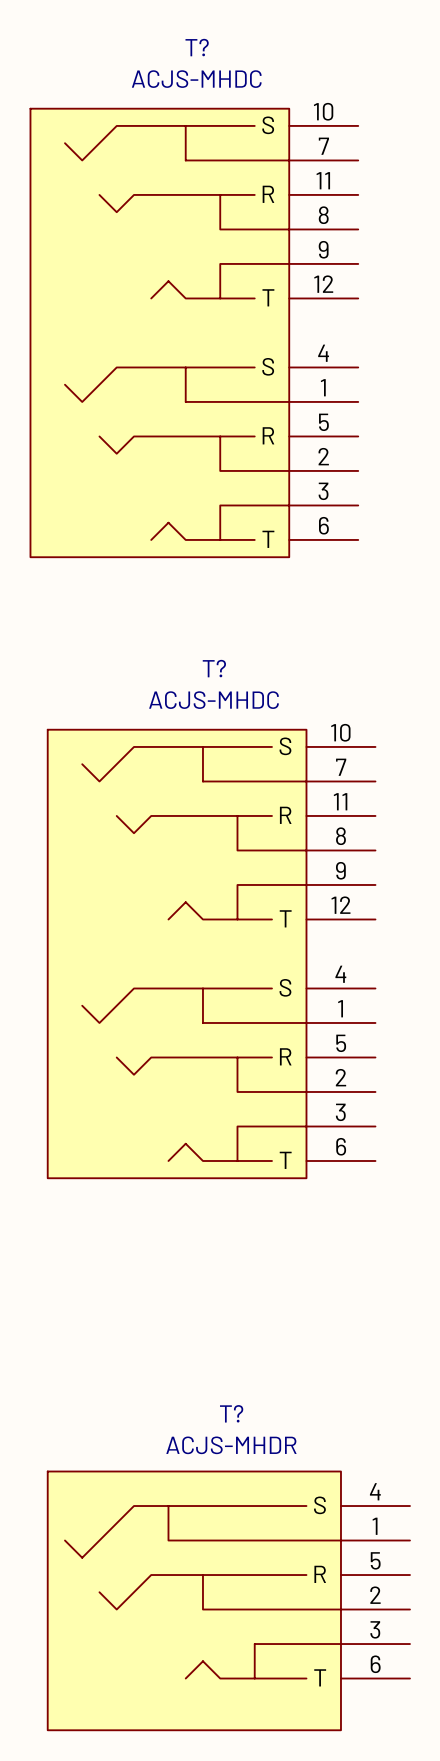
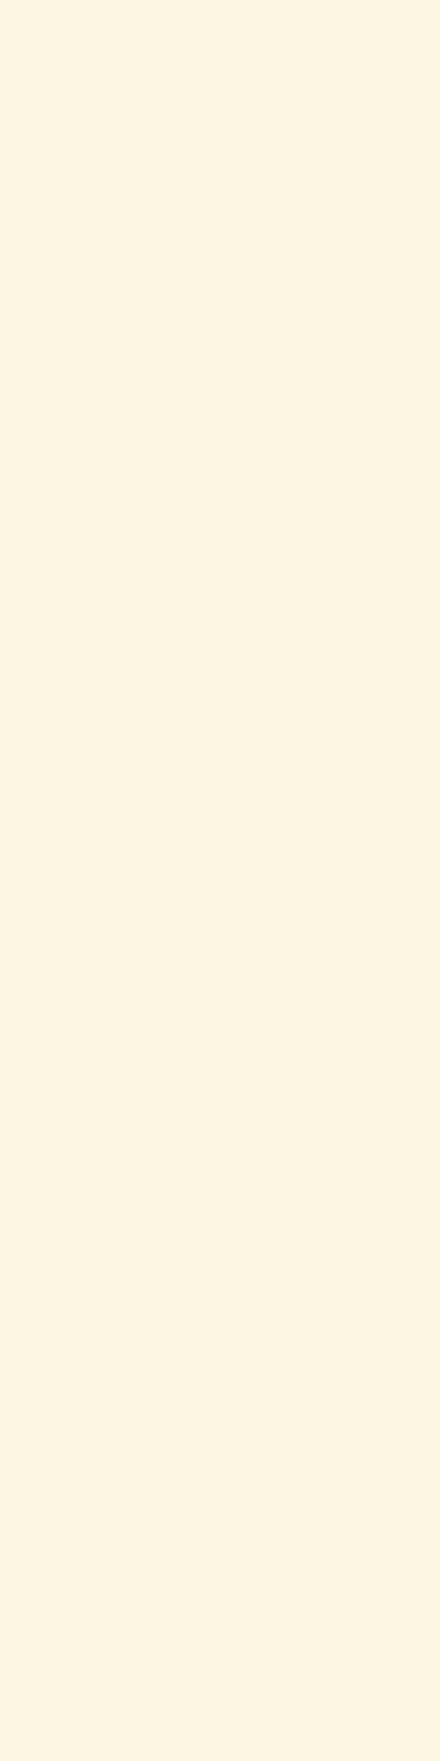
T?: ACJS-MHDC (194, 332) -> none
T?: ACJS-MHDC (211, 953) -> none
T?: ACJS-MHDR (228, 1600) -> none

